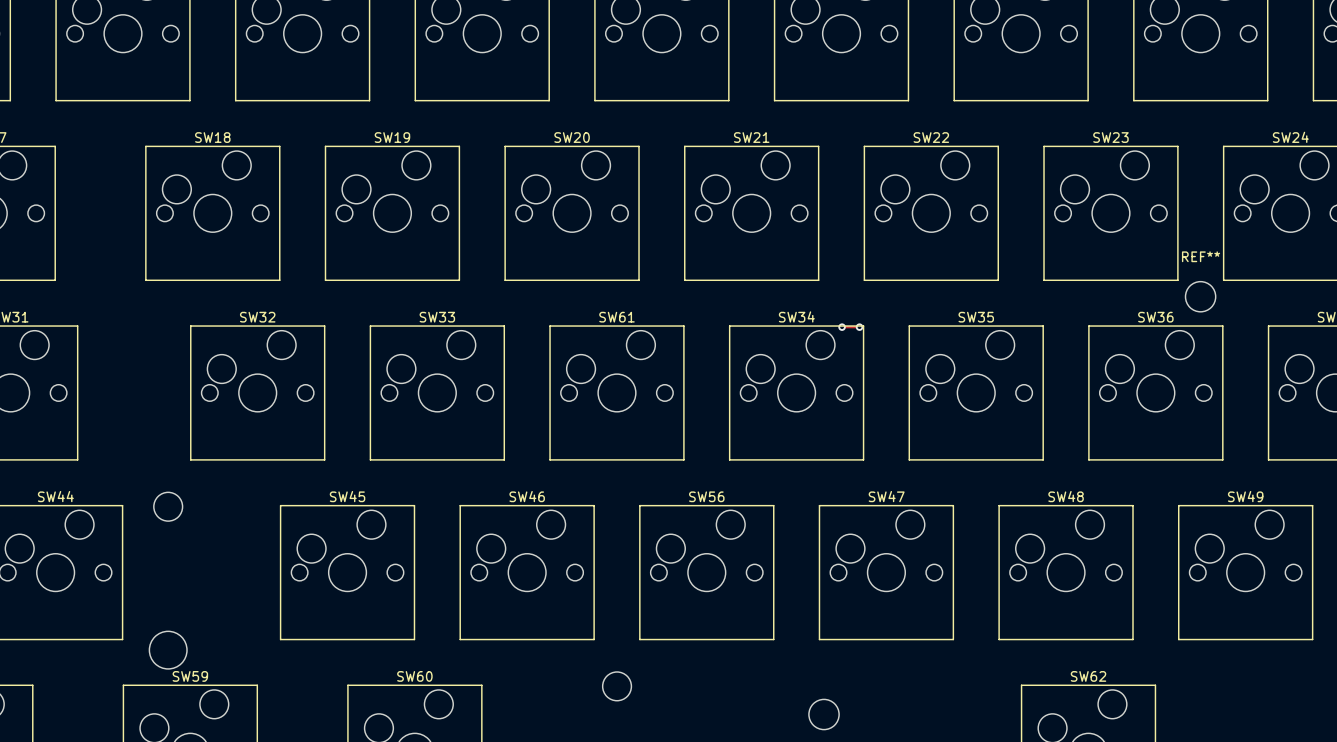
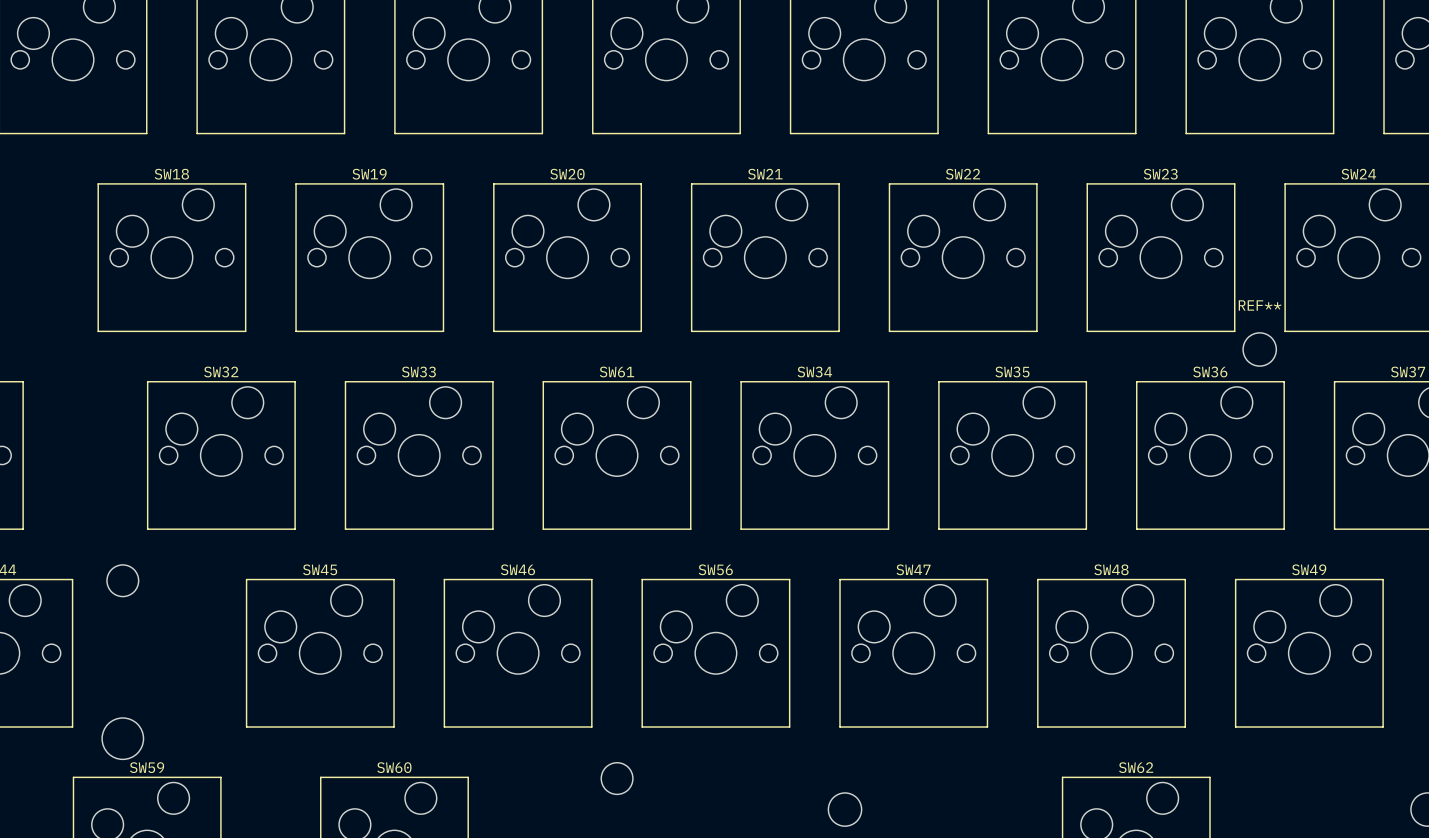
track: (842, 327) (859, 327) -> none
via: (842, 327) -> none
via: (859, 327) -> none

